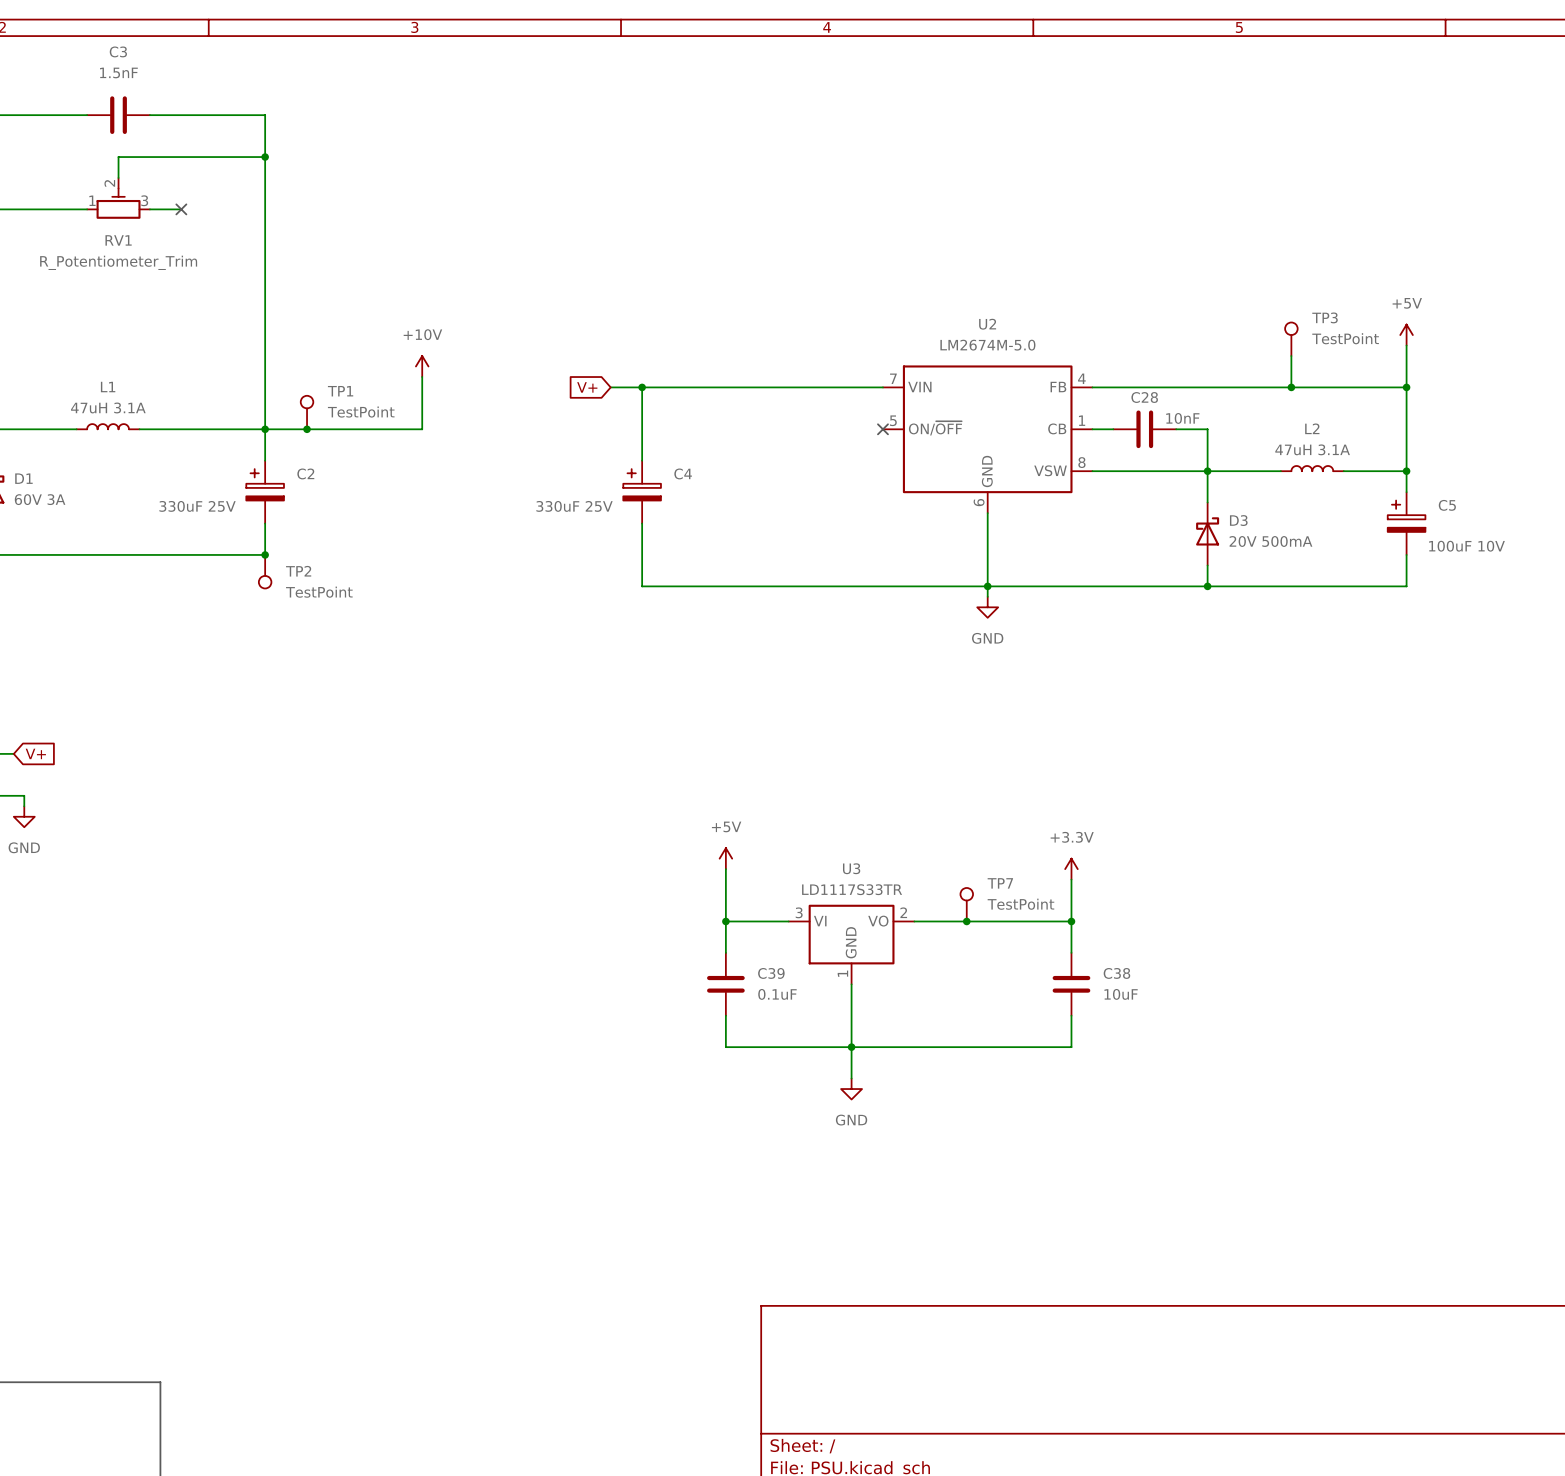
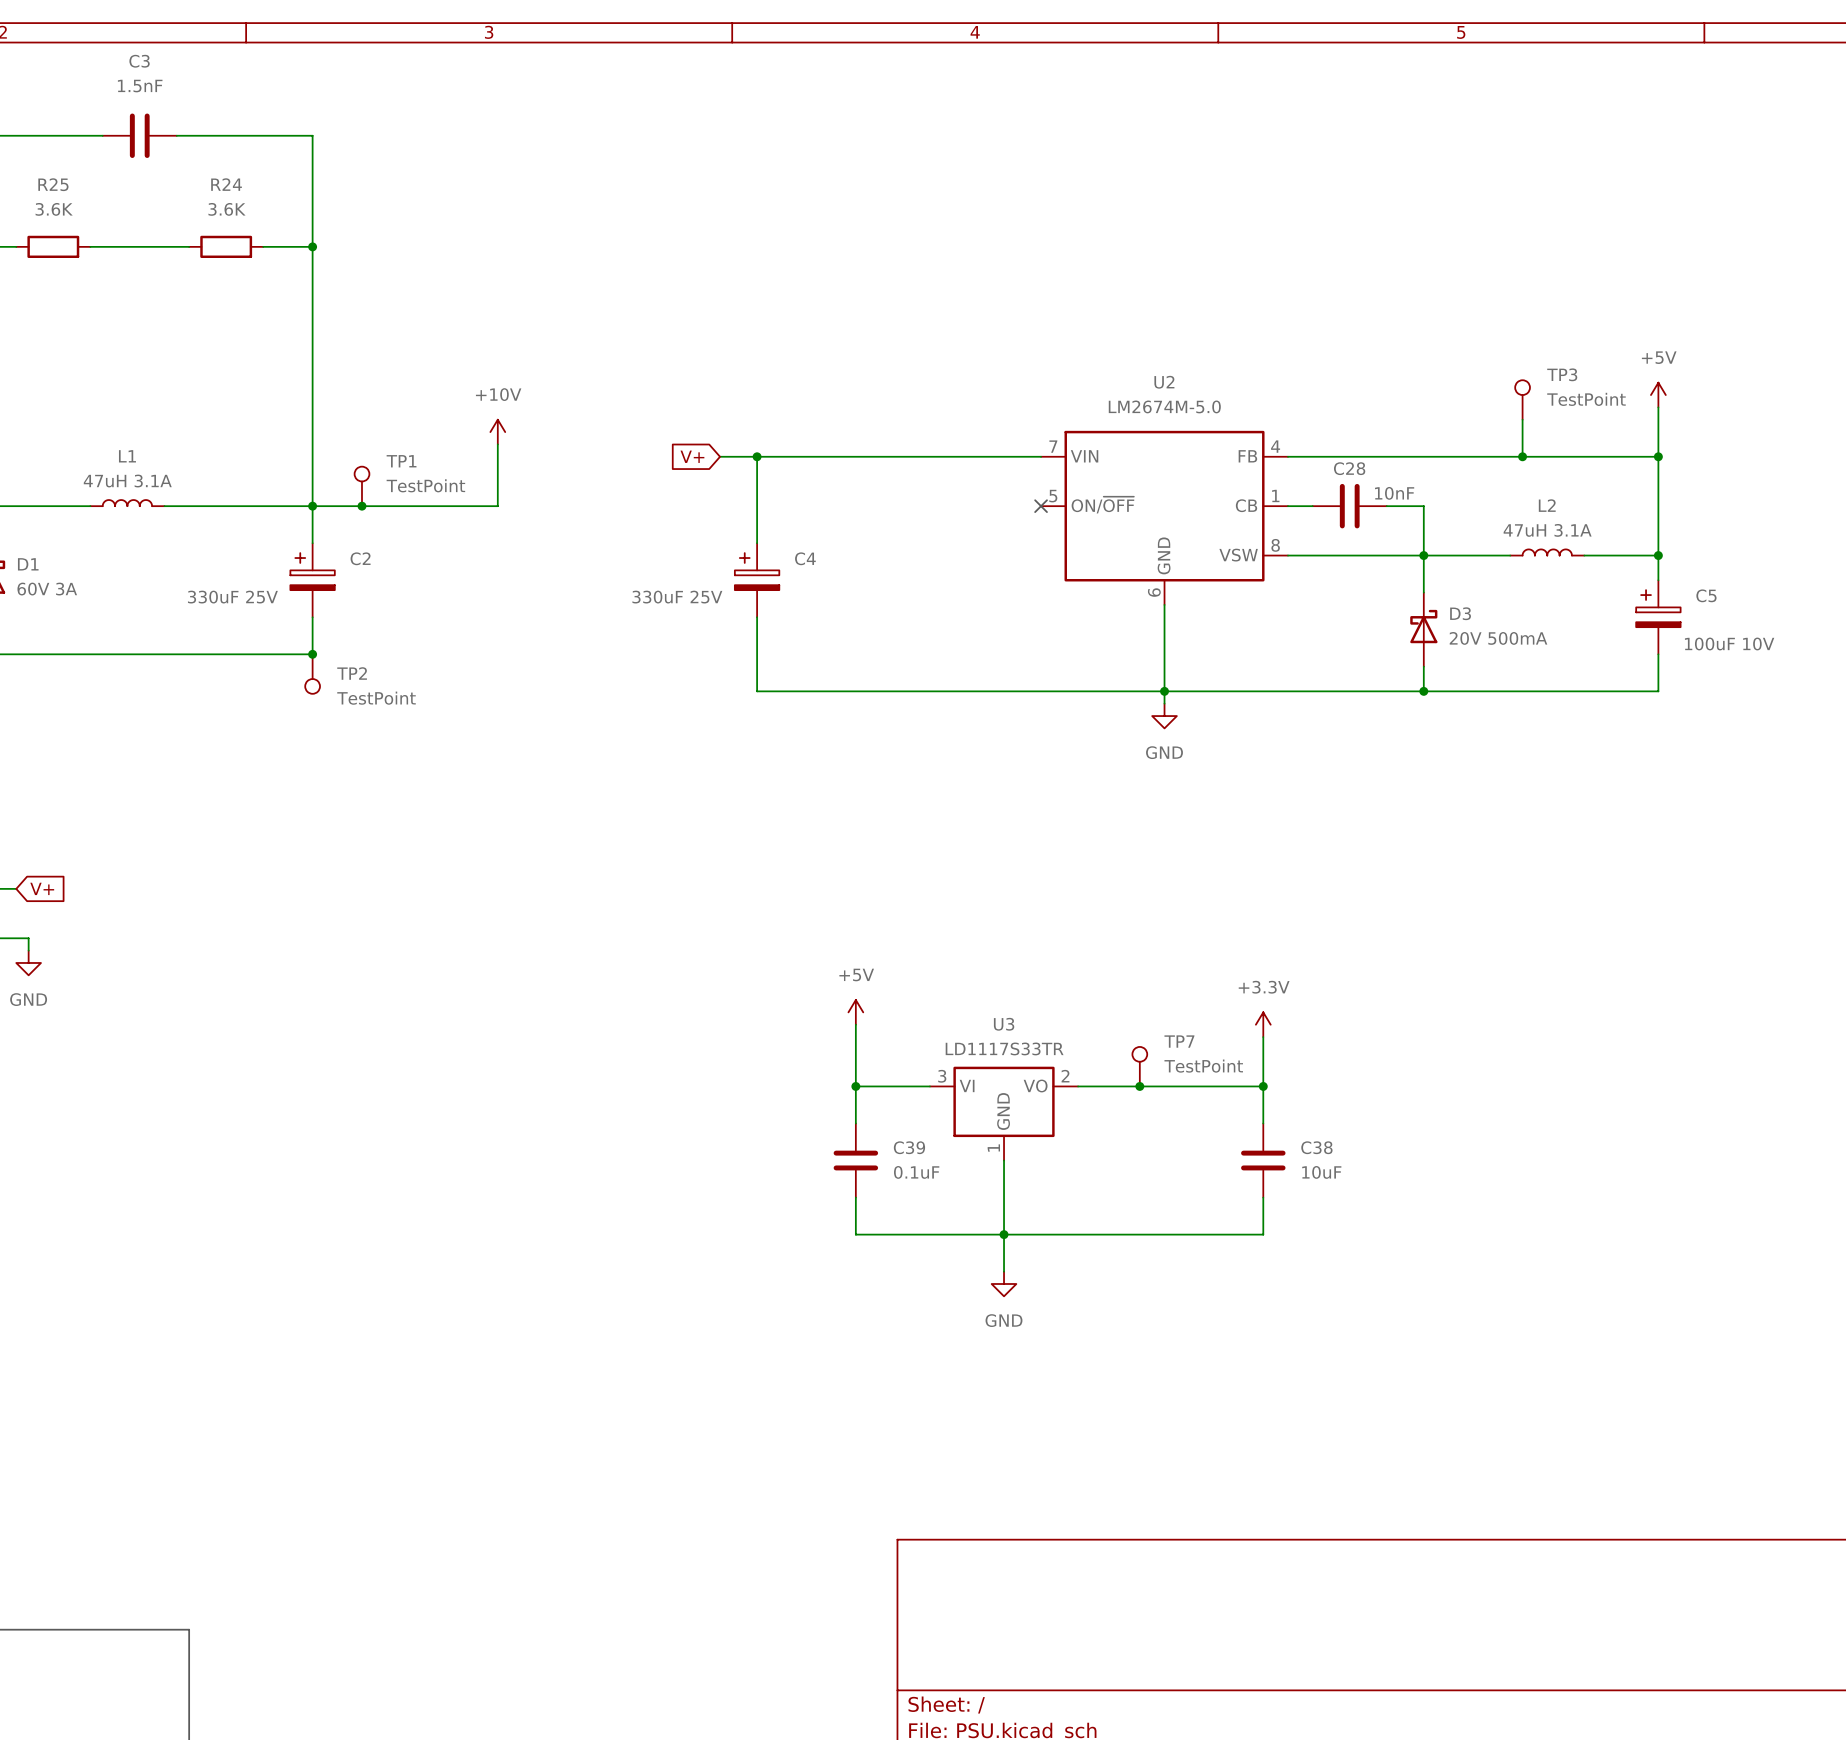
wire: (265, 157) (118, 157) (118, 177) -> none
junction: (265, 157) -> none
RV1: R_Potentiometer_Trim (118, 198) -> none
wire: (13, 209) (76, 209) -> (102, 246) (176, 246)
R25: none -> 3.6K (53, 246)
no-connect mark: (181, 209) -> none
R24: none -> 3.6K (226, 246)
wire: none -> (263, 246) (312, 246)
junction: none -> (312, 246)

